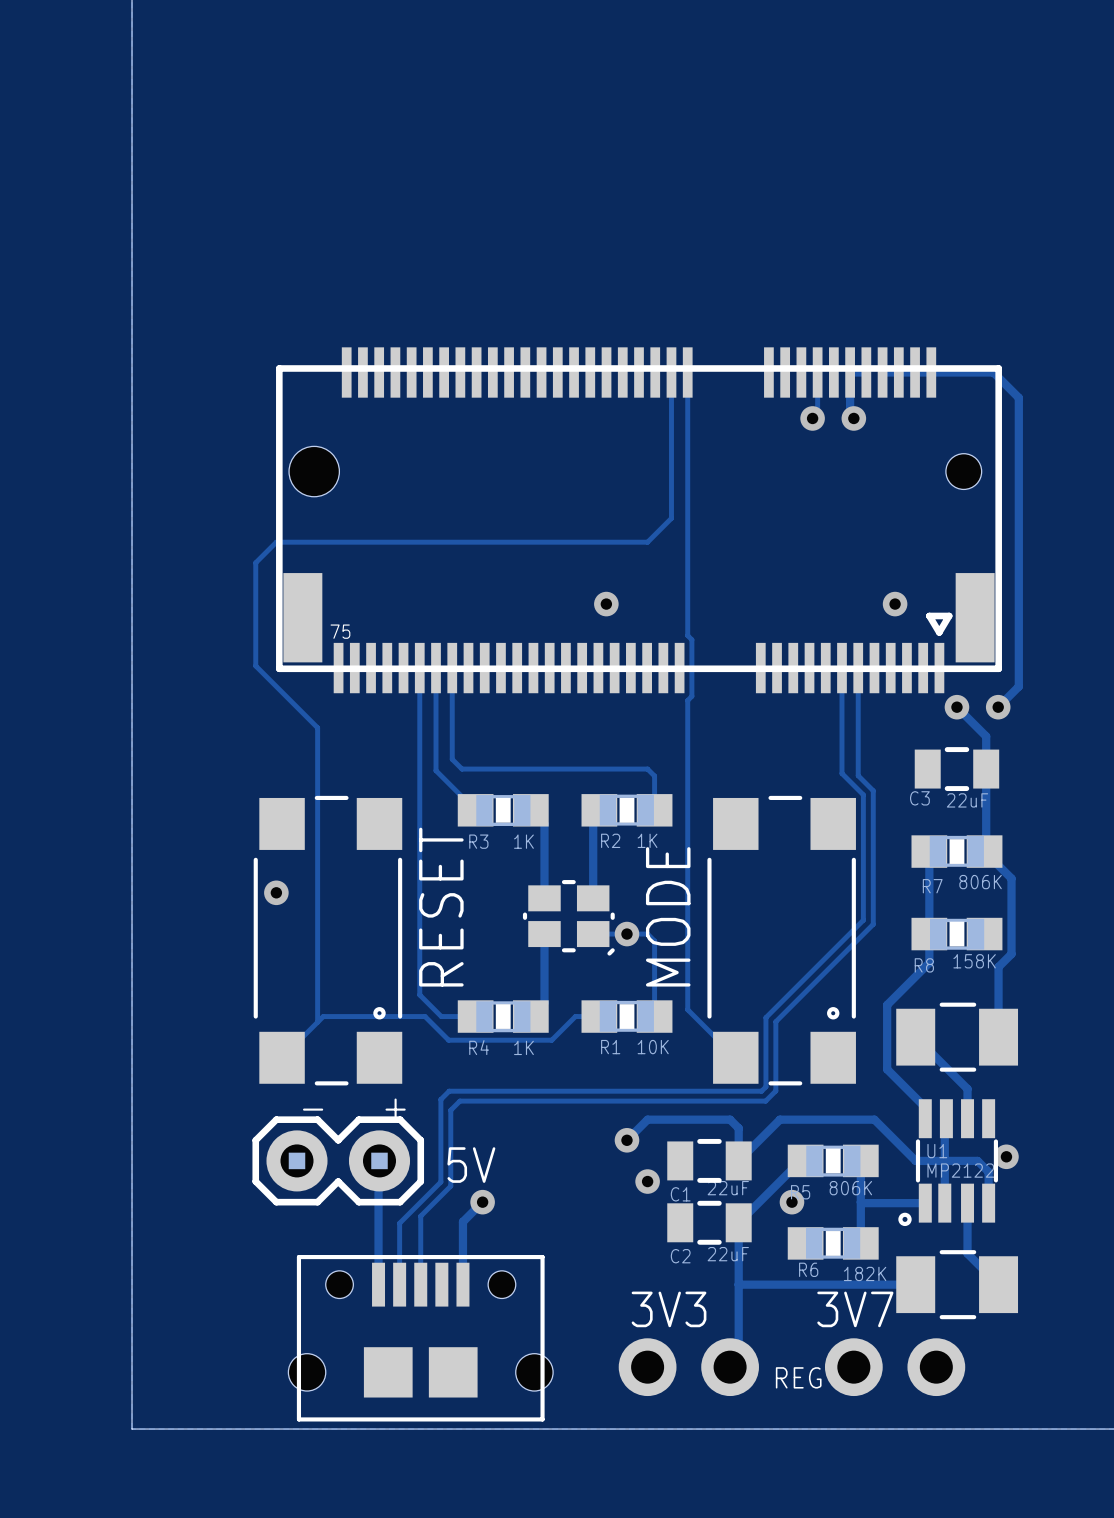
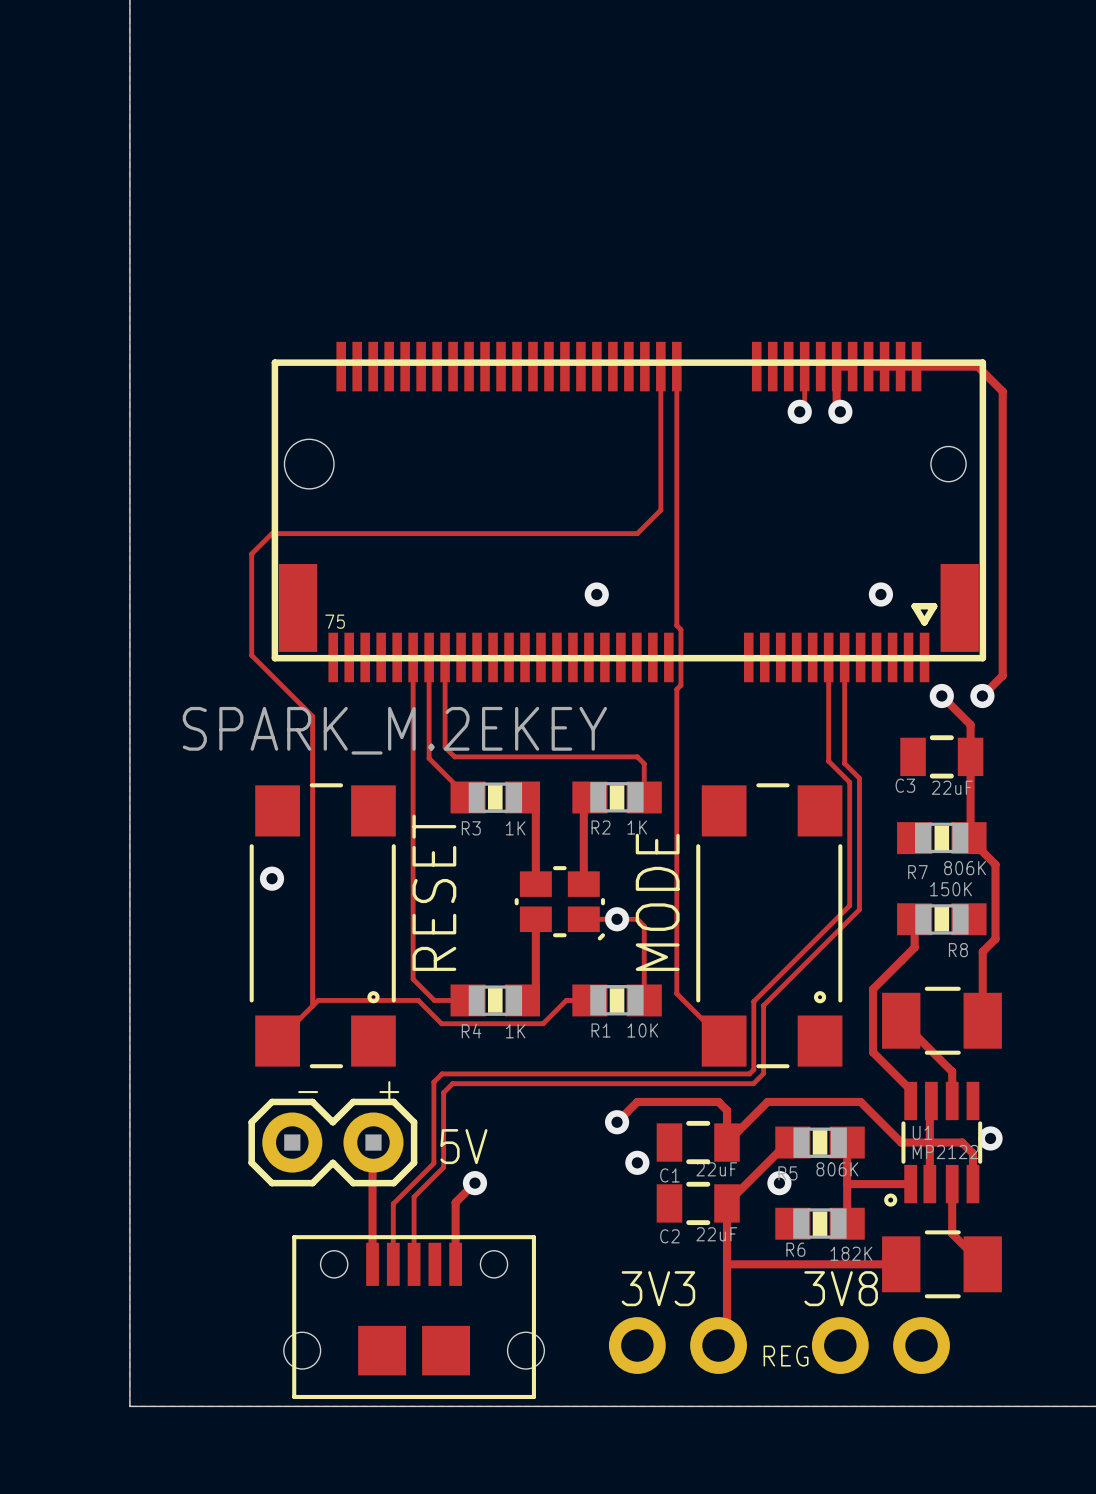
part value: none -> SPARK_M.2EKEY (394, 730)
track: (929, 851) (929, 934) -> none
R8 value: 158K (974, 961) -> 150K (951, 889)
R8 name position: R8 (924, 965) -> R8 (958, 950)
text: 3V7 (855, 1309) -> 3V8 (841, 1288)

